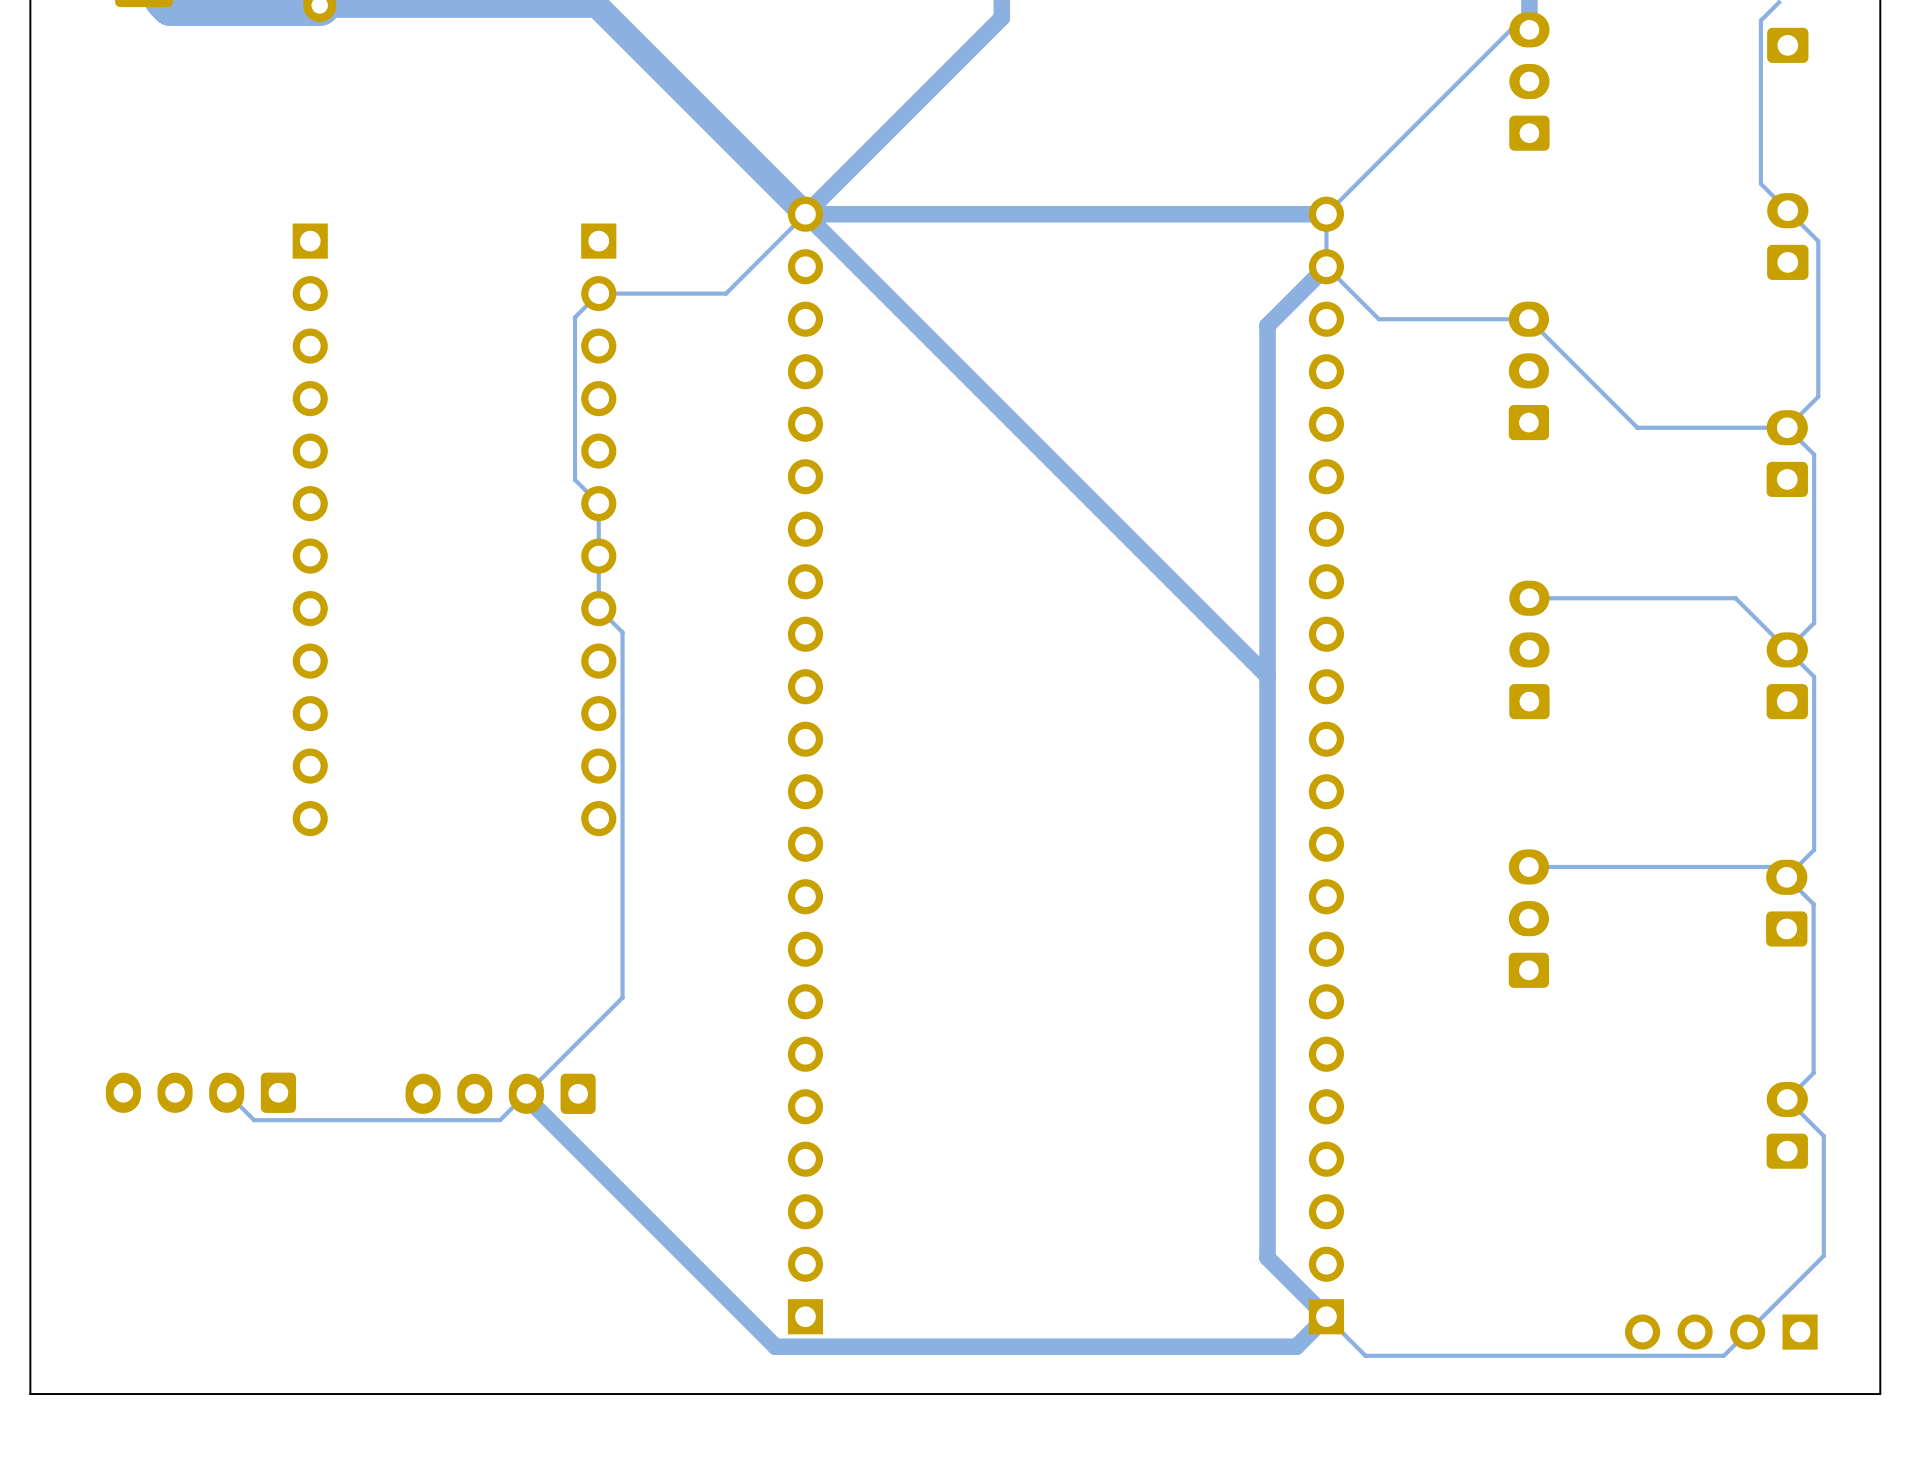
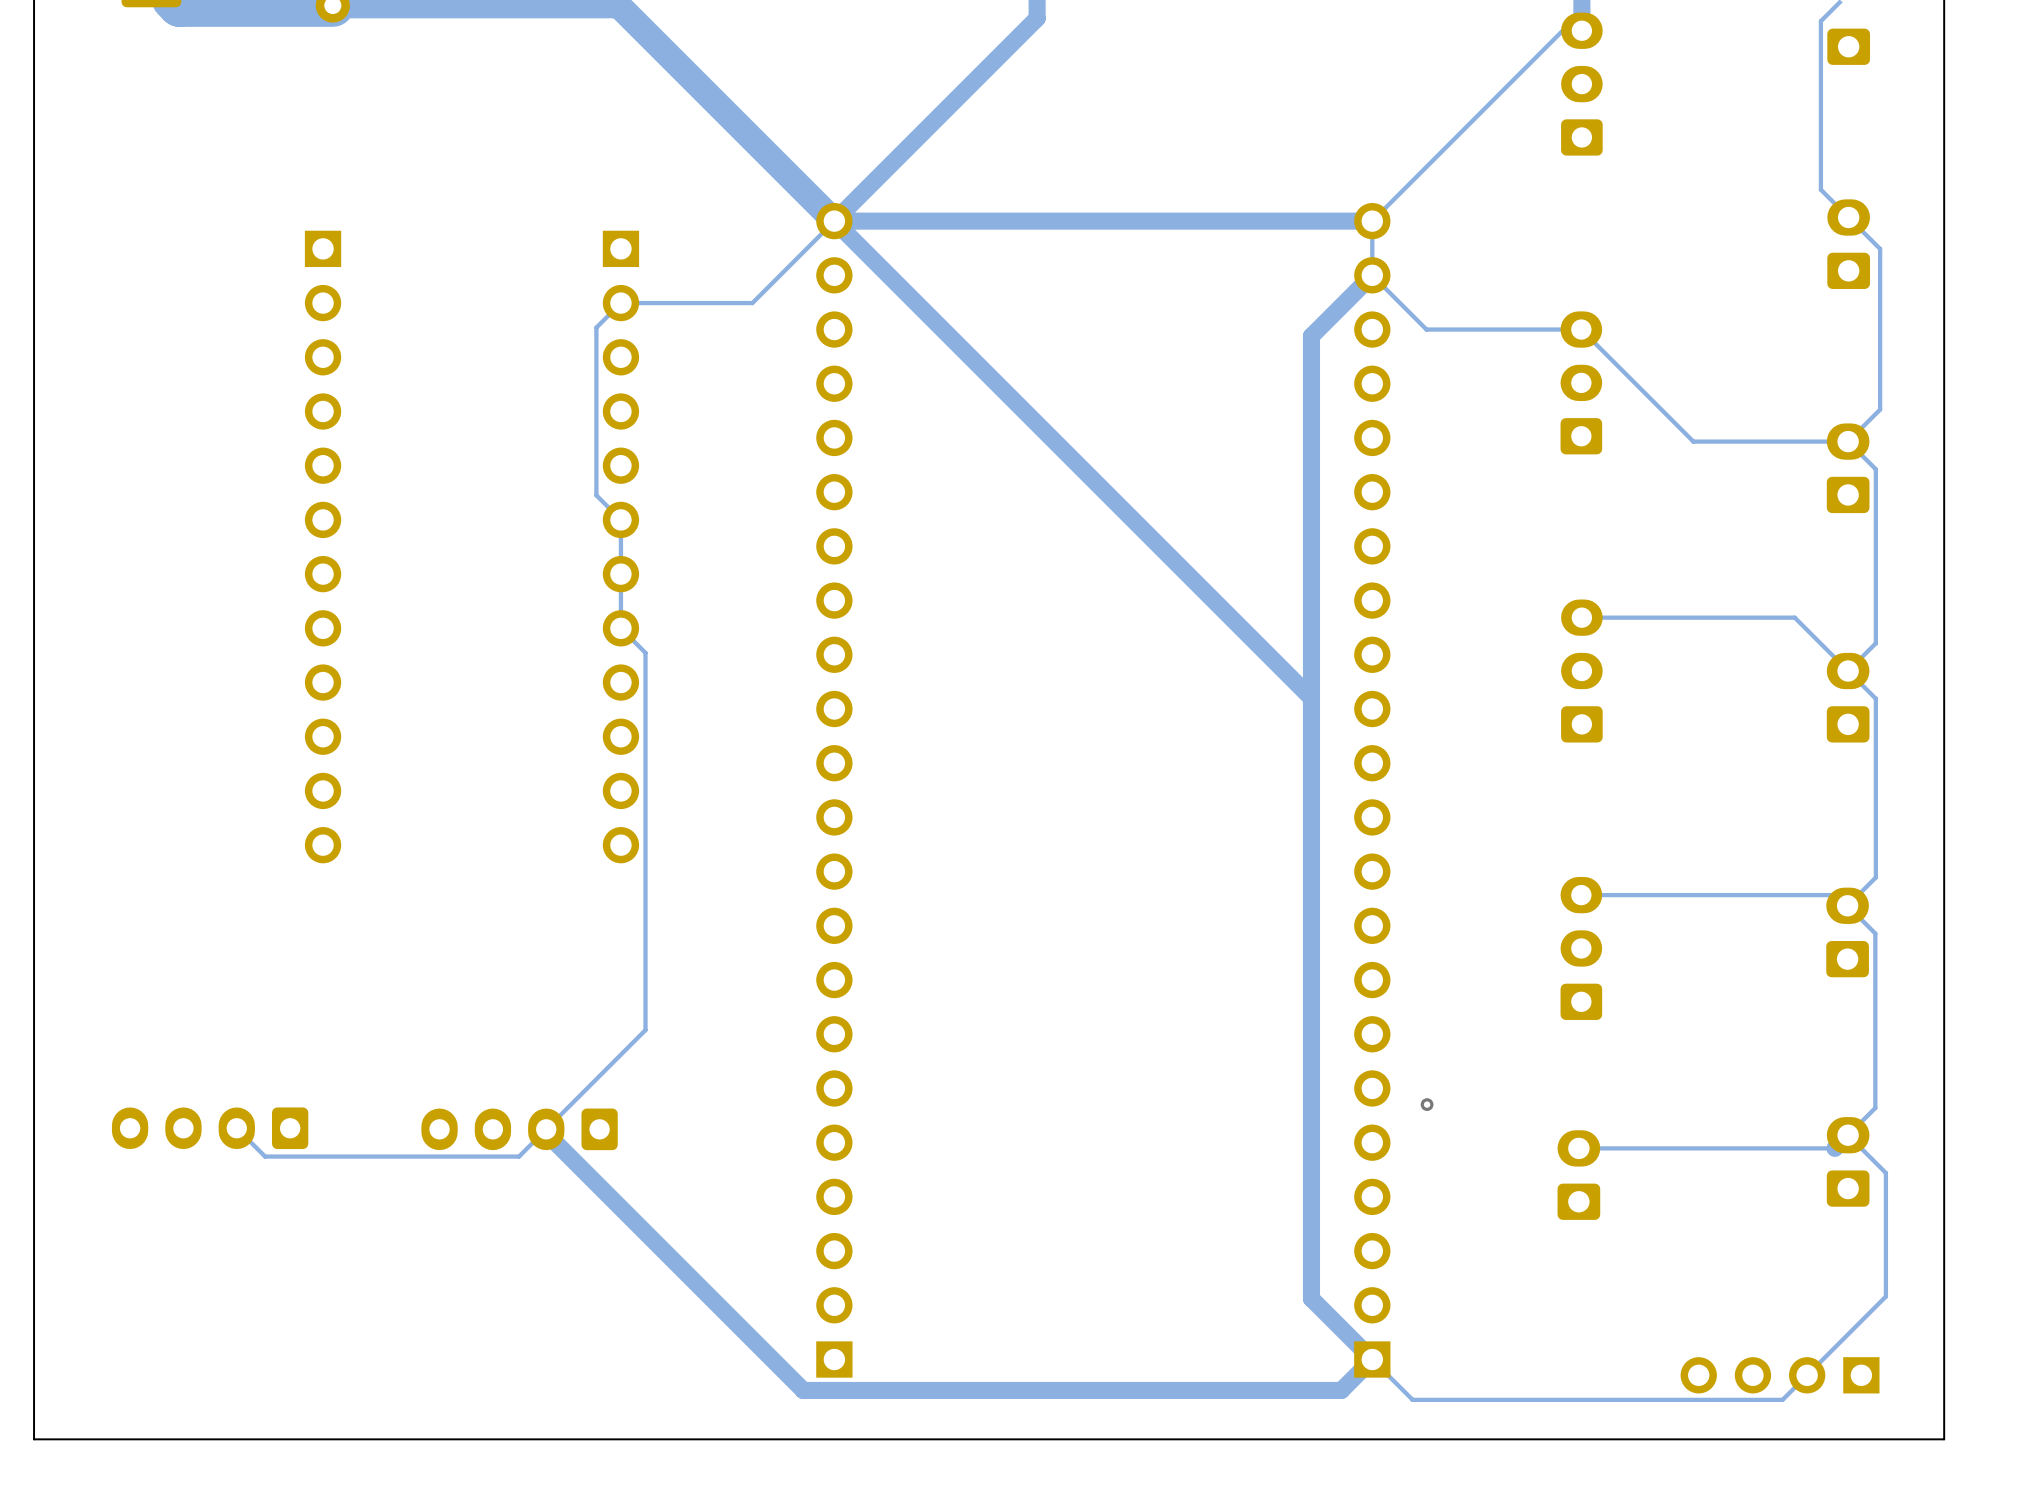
via: none -> (1427, 1104)
track: none -> (1848, 1135) (1834, 1148) (1578, 1148)
part: none -> (1578, 1175)

